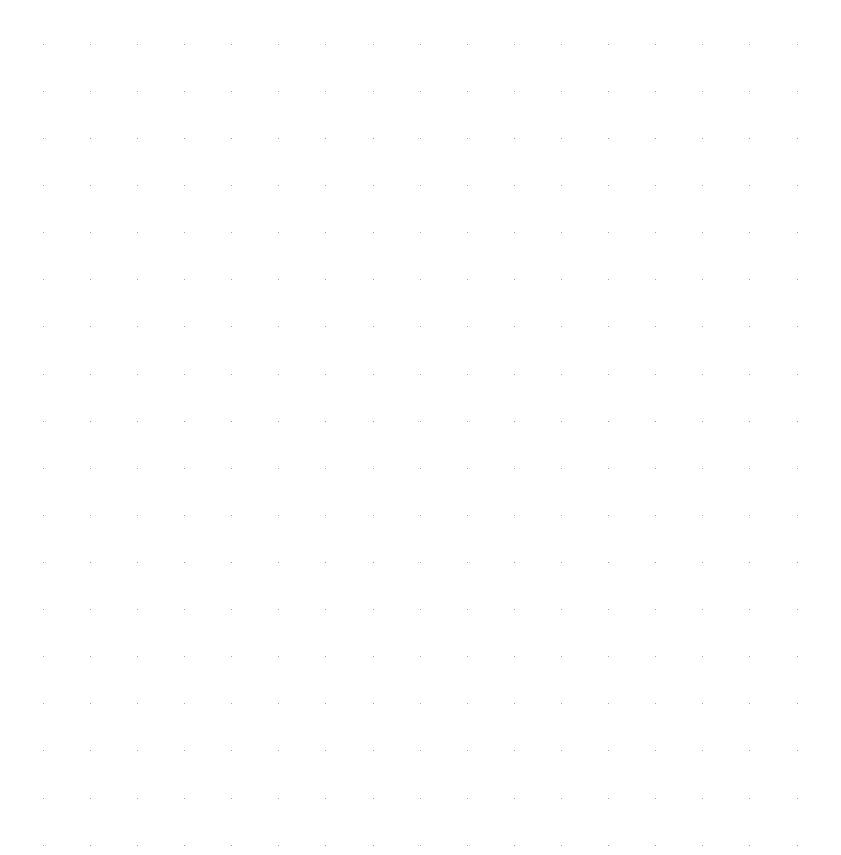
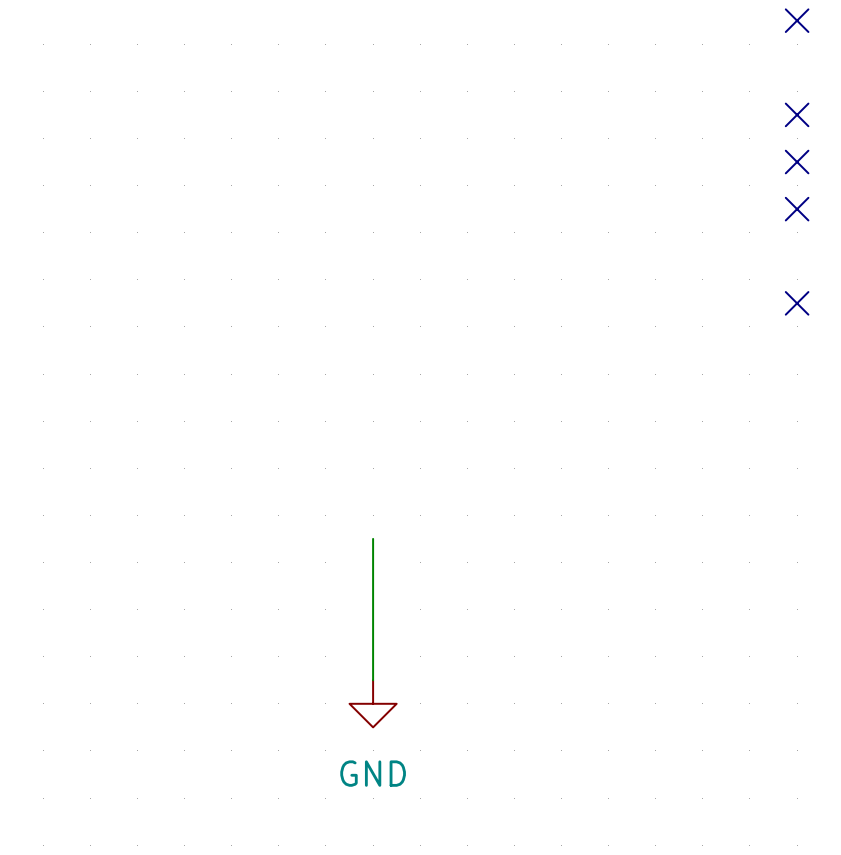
no-connect mark: none -> (797, 20)
no-connect mark: none -> (797, 114)
no-connect mark: none -> (797, 162)
no-connect mark: none -> (797, 209)
no-connect mark: none -> (797, 303)
wire: none -> (373, 538) (373, 680)
power symbol: none -> GND (373, 703)

